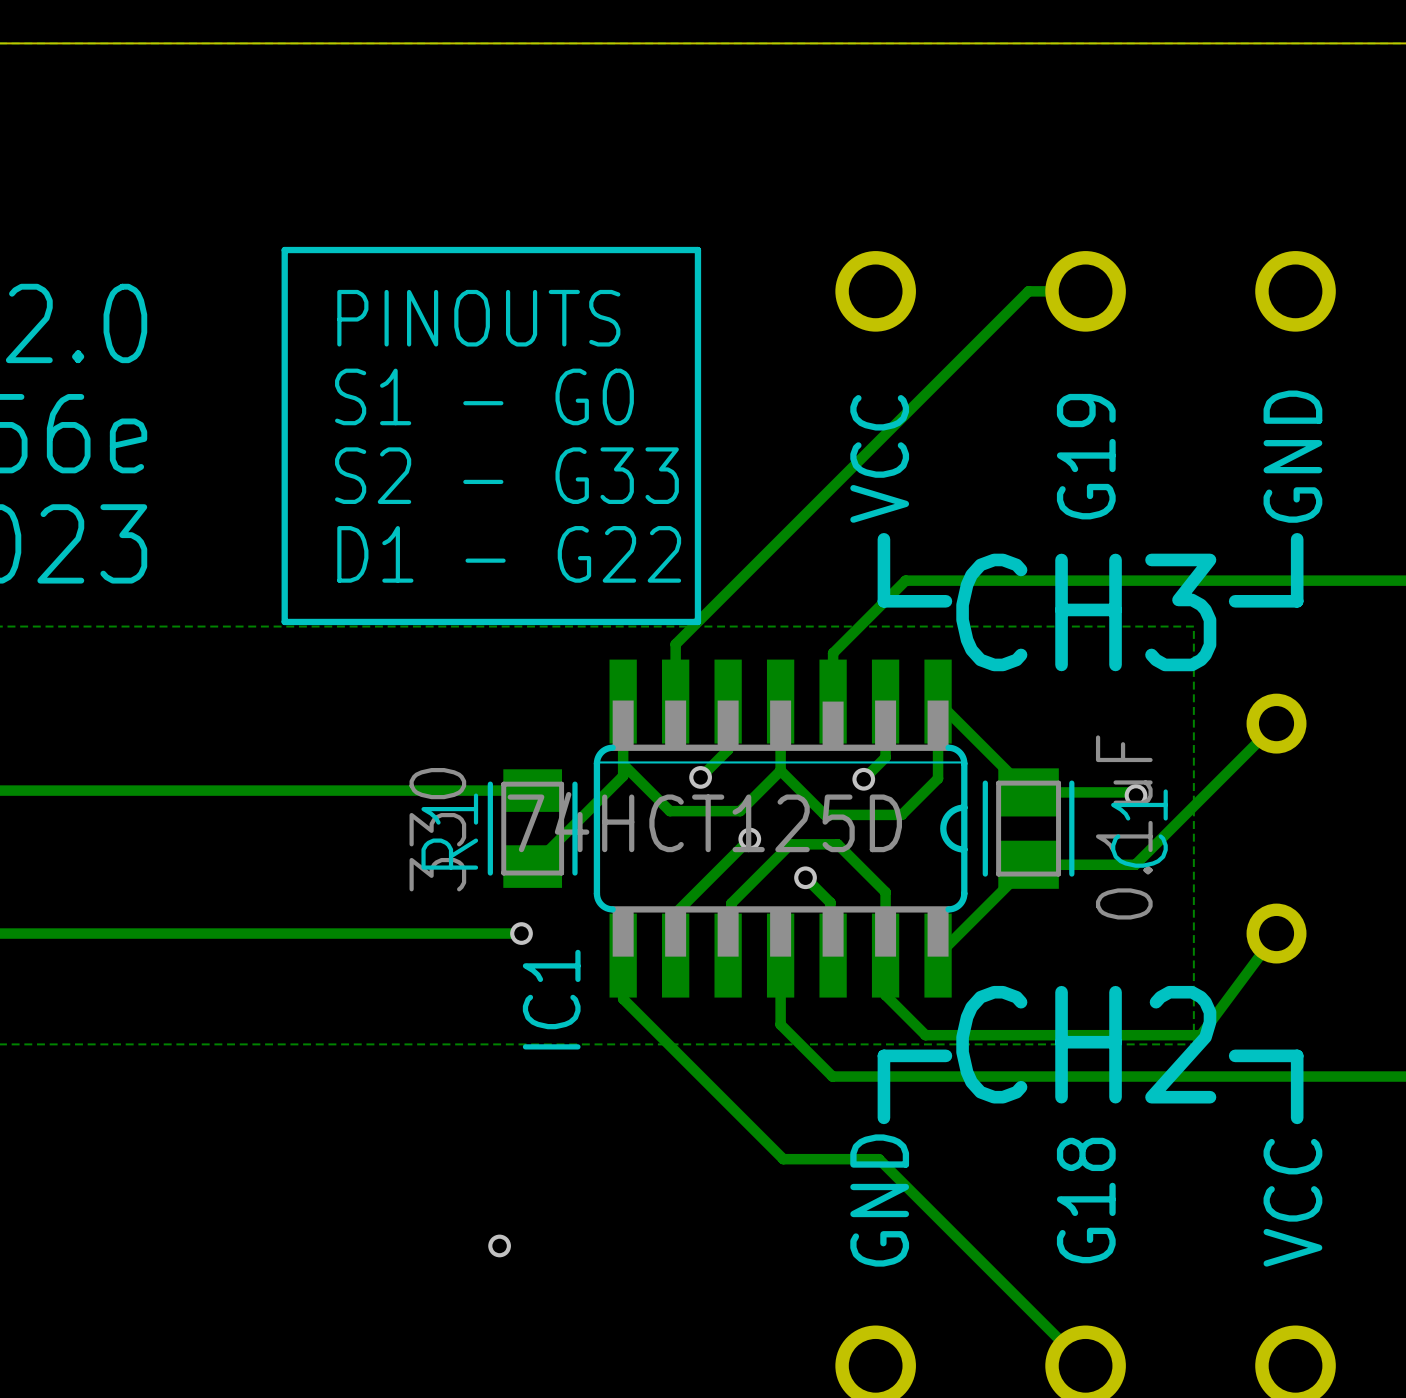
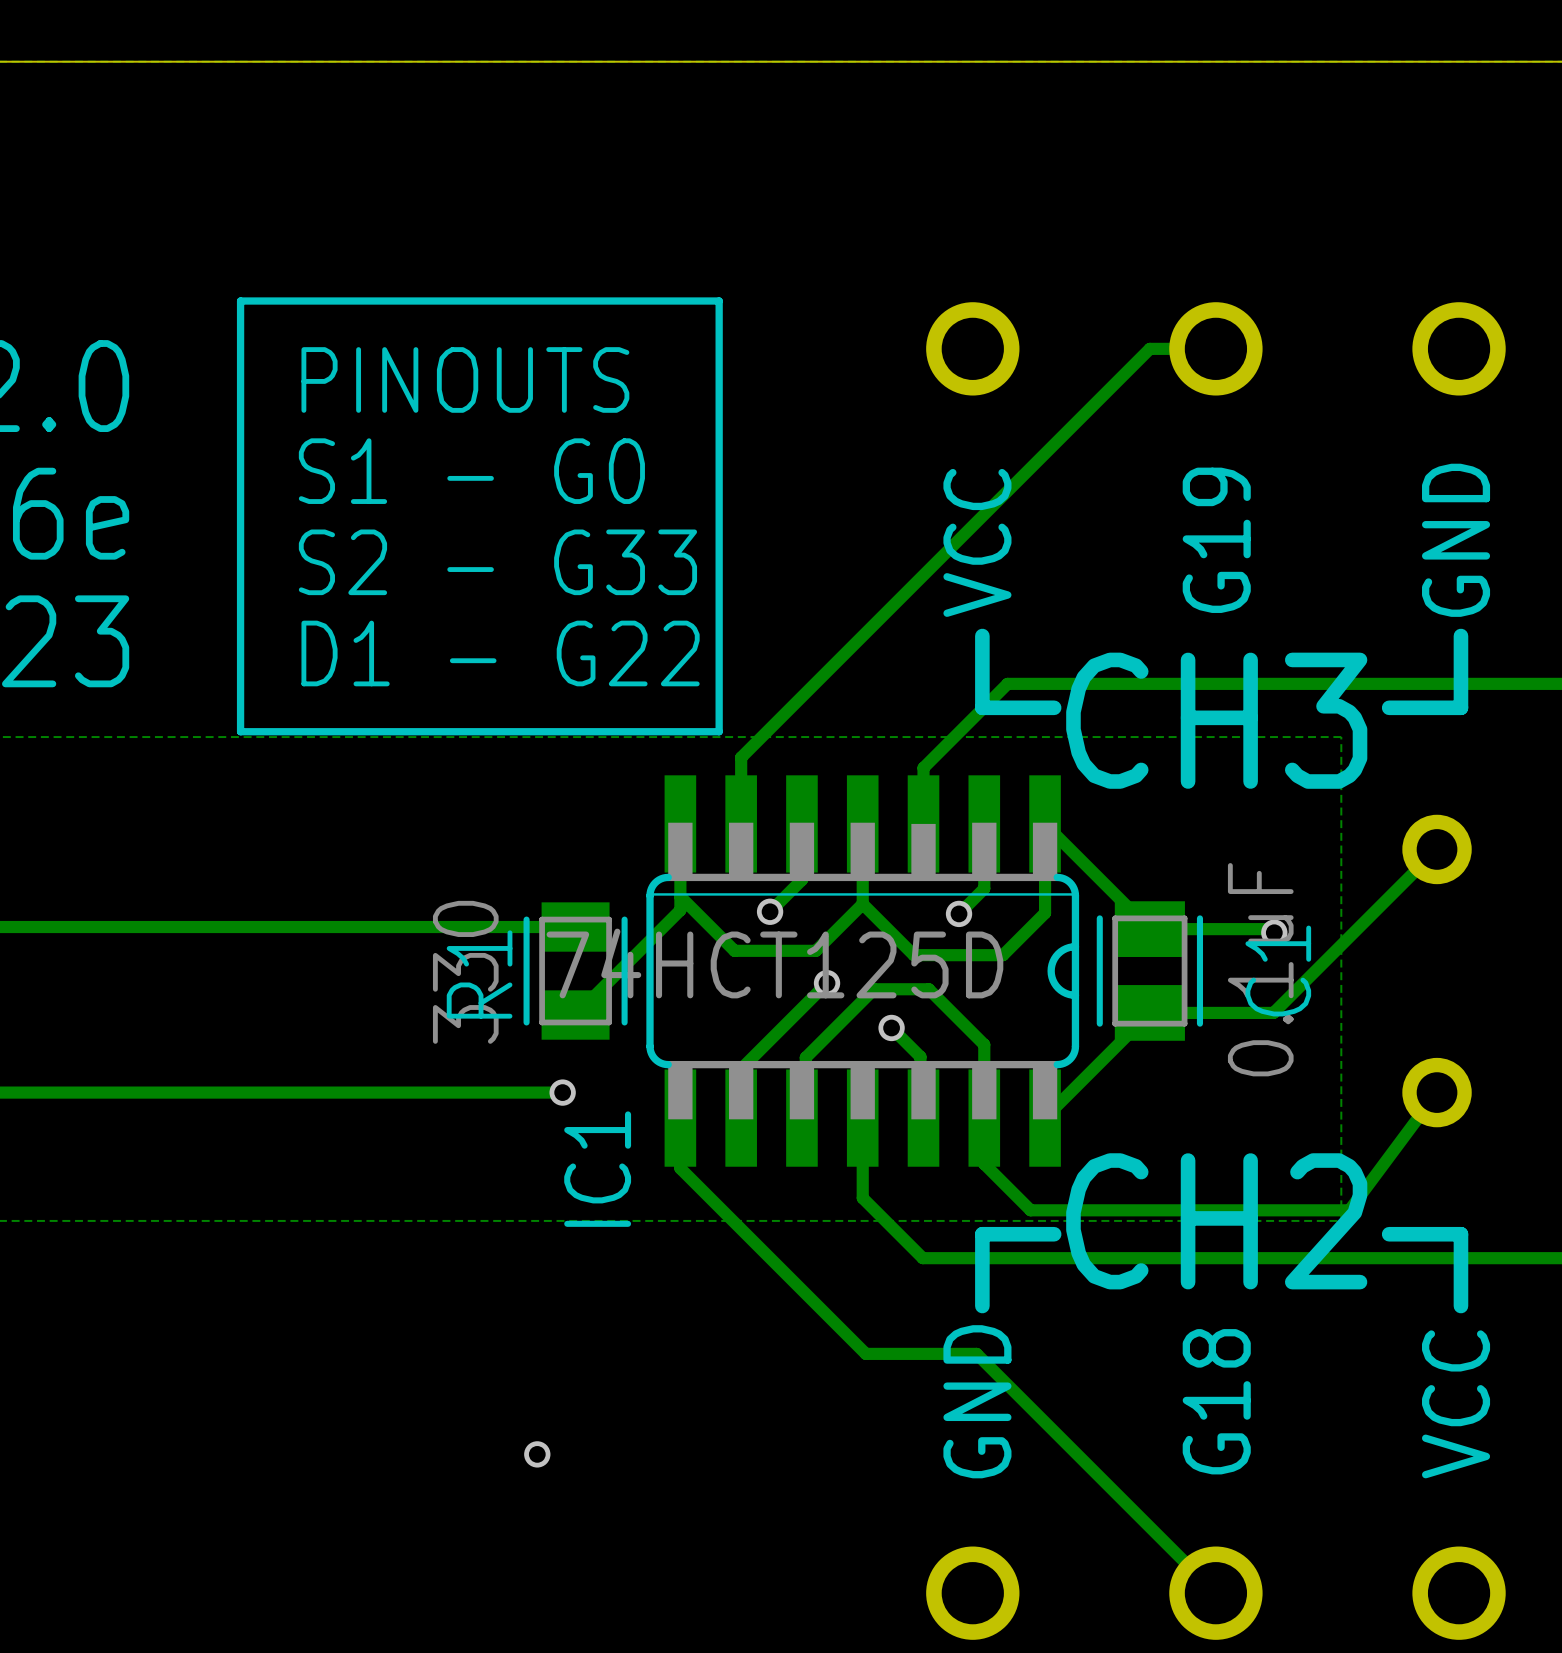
line: (284, 250) (284, 621) -> (288, 301) (240, 301) (240, 731) (288, 731)
line: (656, 250) (697, 250) (697, 621) (656, 621) -> (719, 301) (719, 731)
text position: PINOUTS (478, 318) -> PINOUTS (465, 379)
text position: S1 - G0 (484, 396) -> S1 - G0 (471, 471)
text position: S2 - G33 (506, 475) -> S2 - G33 (497, 562)
text position: D1 - G22 (509, 554) -> D1 - G22 (500, 653)

